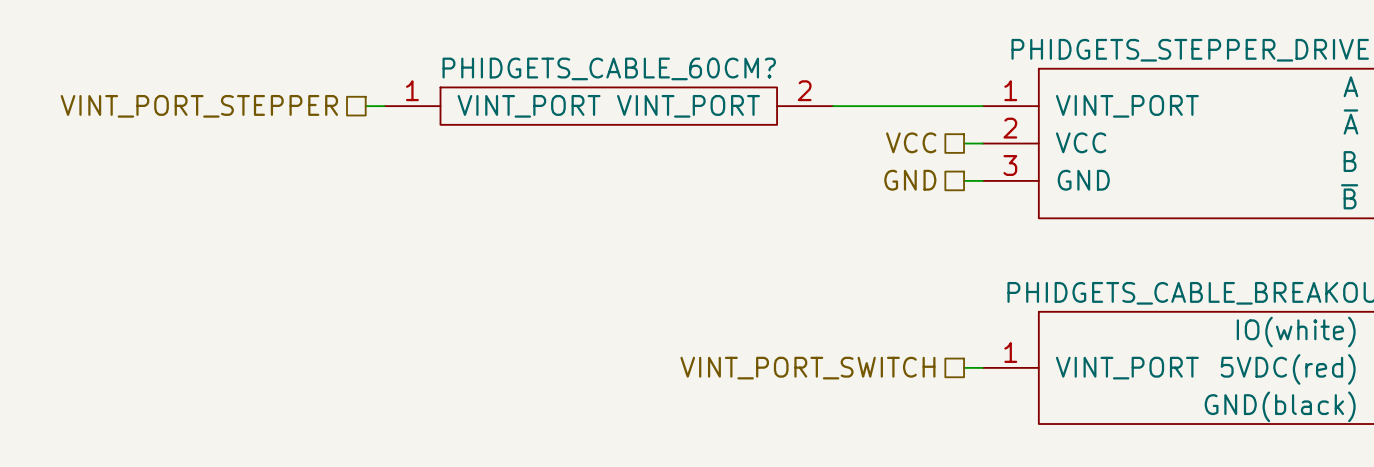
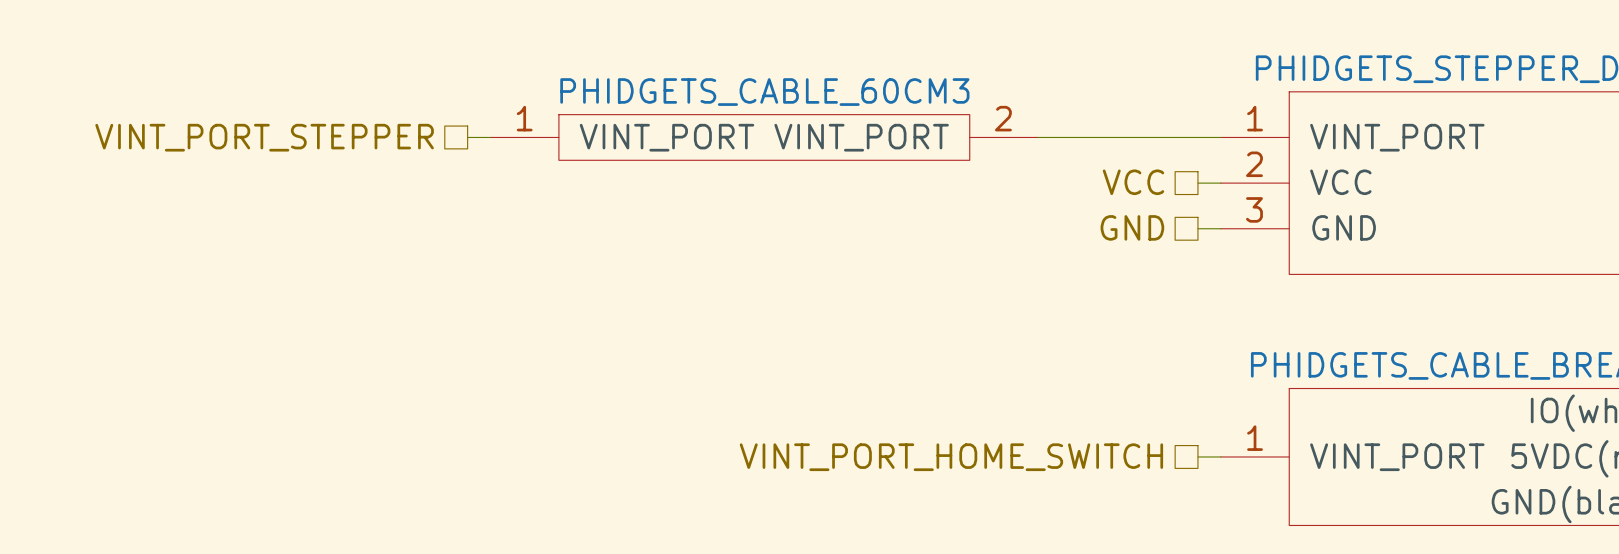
PHIDGETS_CABLE_60CM? name: PHIDGETS_CABLE_60CM? (609, 68) -> PHIDGETS_CABLE_60CM3 (764, 92)
hierarchical label: VINT_PORT_SWITCH (807, 368) -> VINT_PORT_HOME_SWITCH (951, 457)

